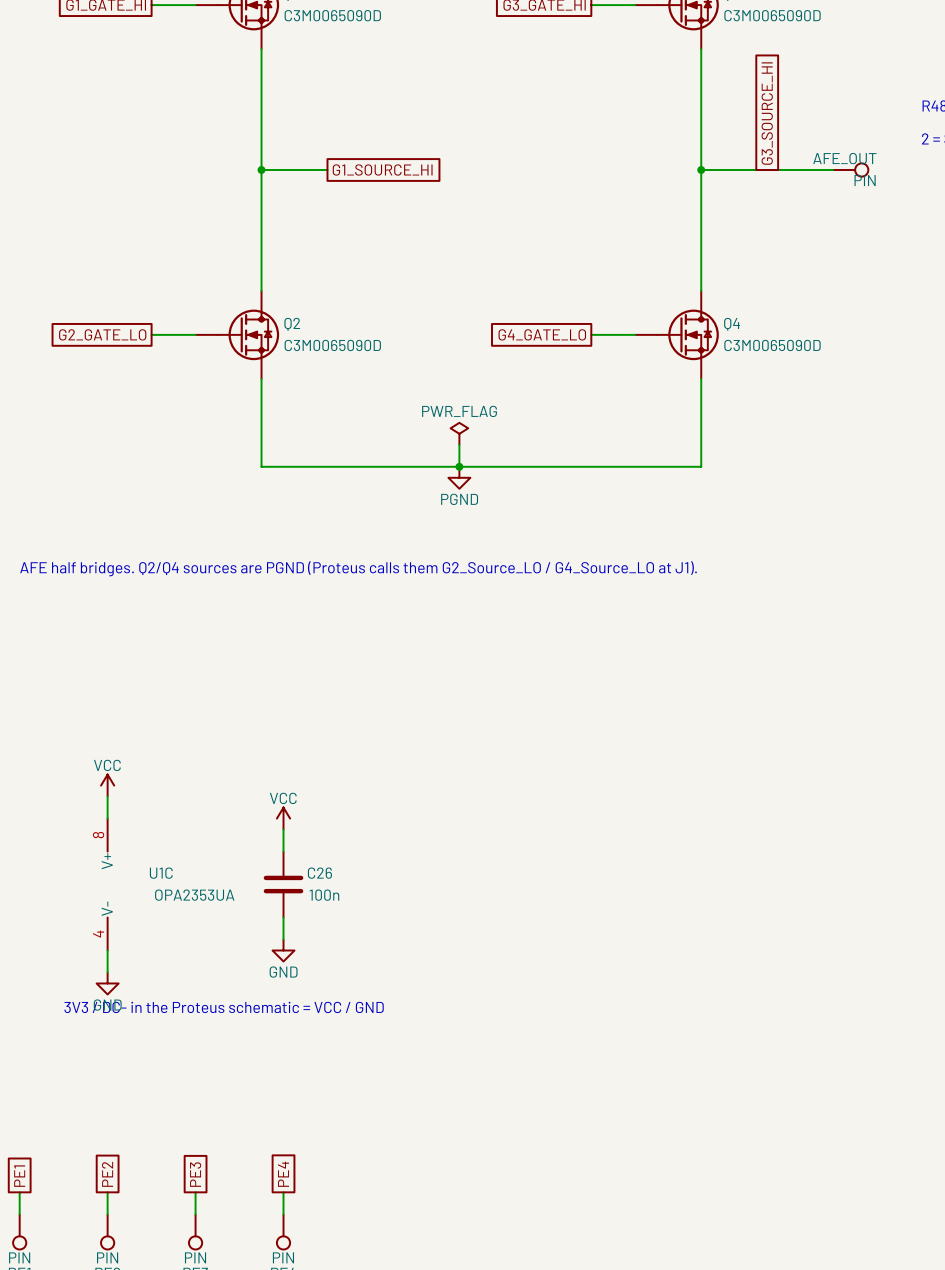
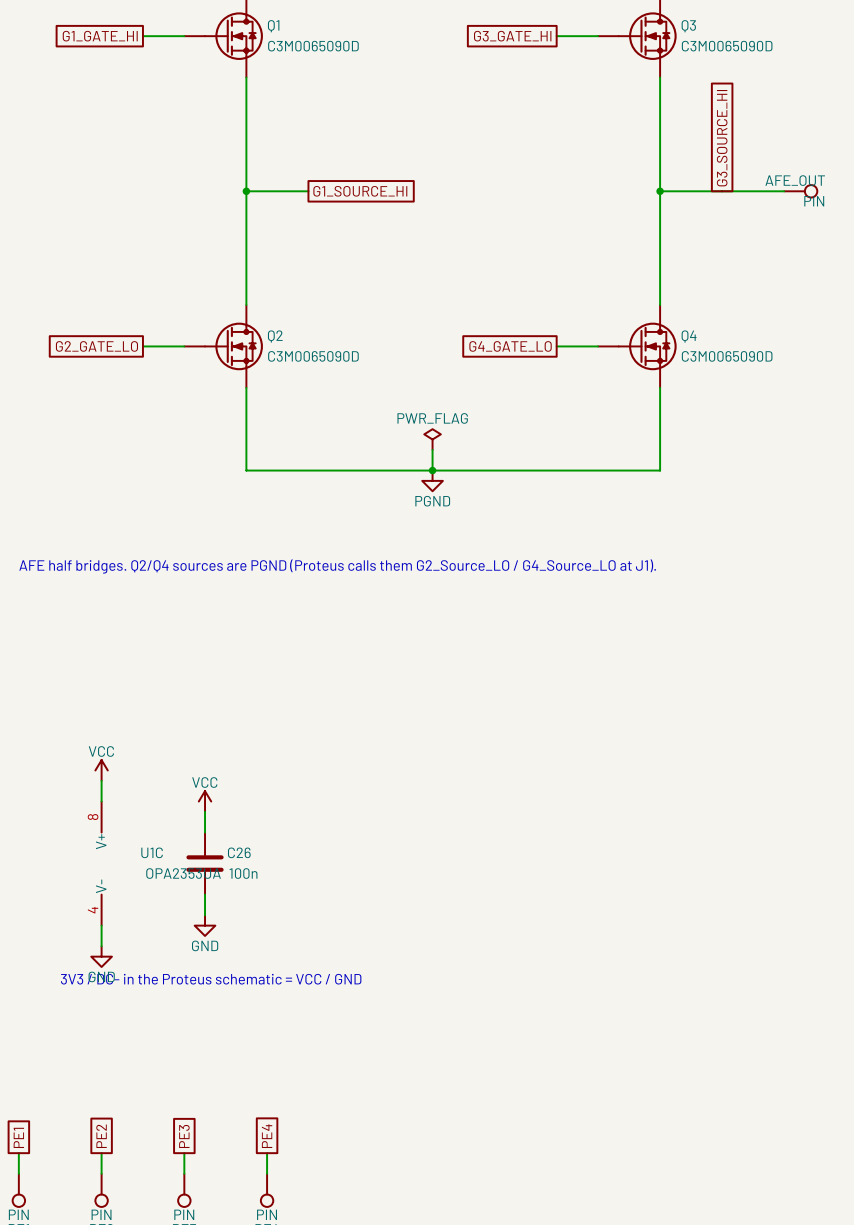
power symbol position: VCC (283, 818) -> VCC (205, 801)
wire: (283, 829) (283, 851) -> (205, 811) (205, 832)
C26 position: (283, 884) -> (205, 863)
wire: (283, 917) (283, 939) -> (205, 894) (205, 915)
power symbol position: GND (283, 950) -> GND (205, 925)

